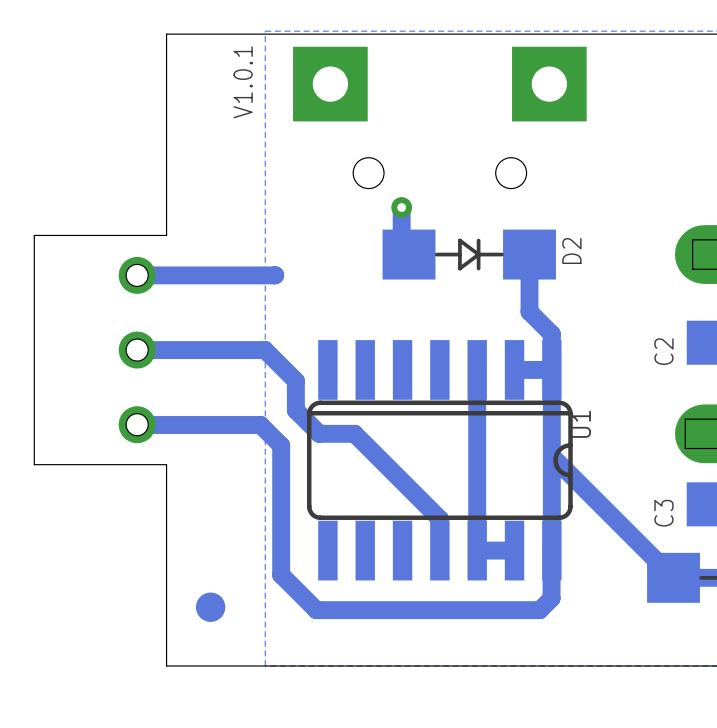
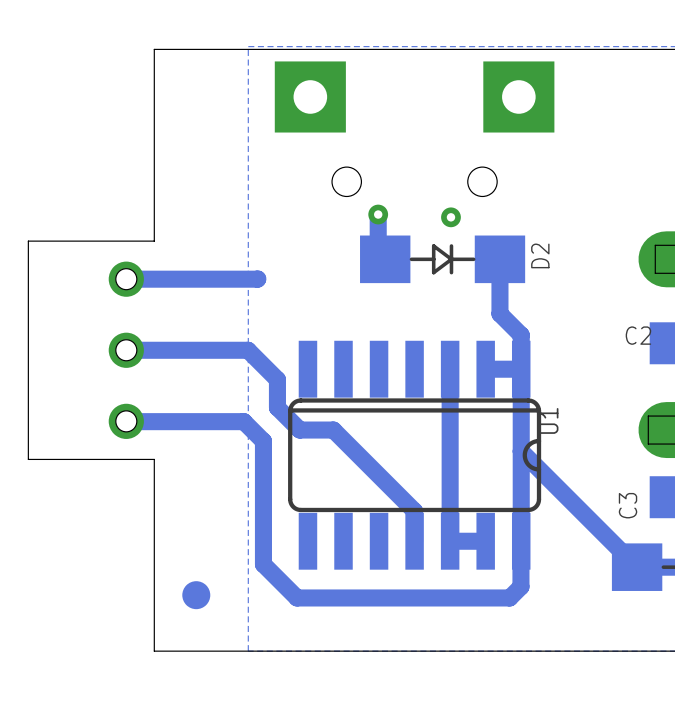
text: V1.0.1 (243, 82) -> none
via: none -> (450, 217)
C2 name rotation: 0° (663, 351) -> 90° clockwise (638, 335)

